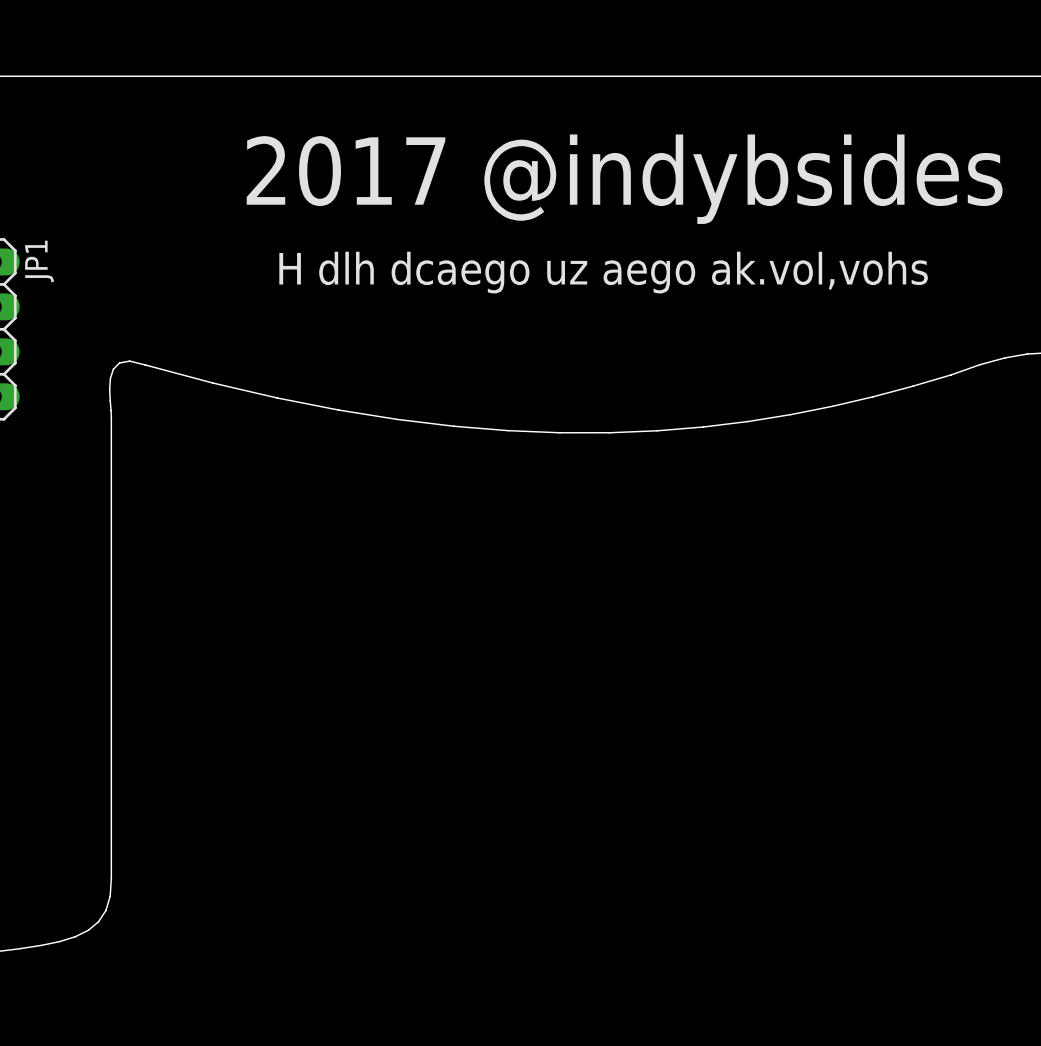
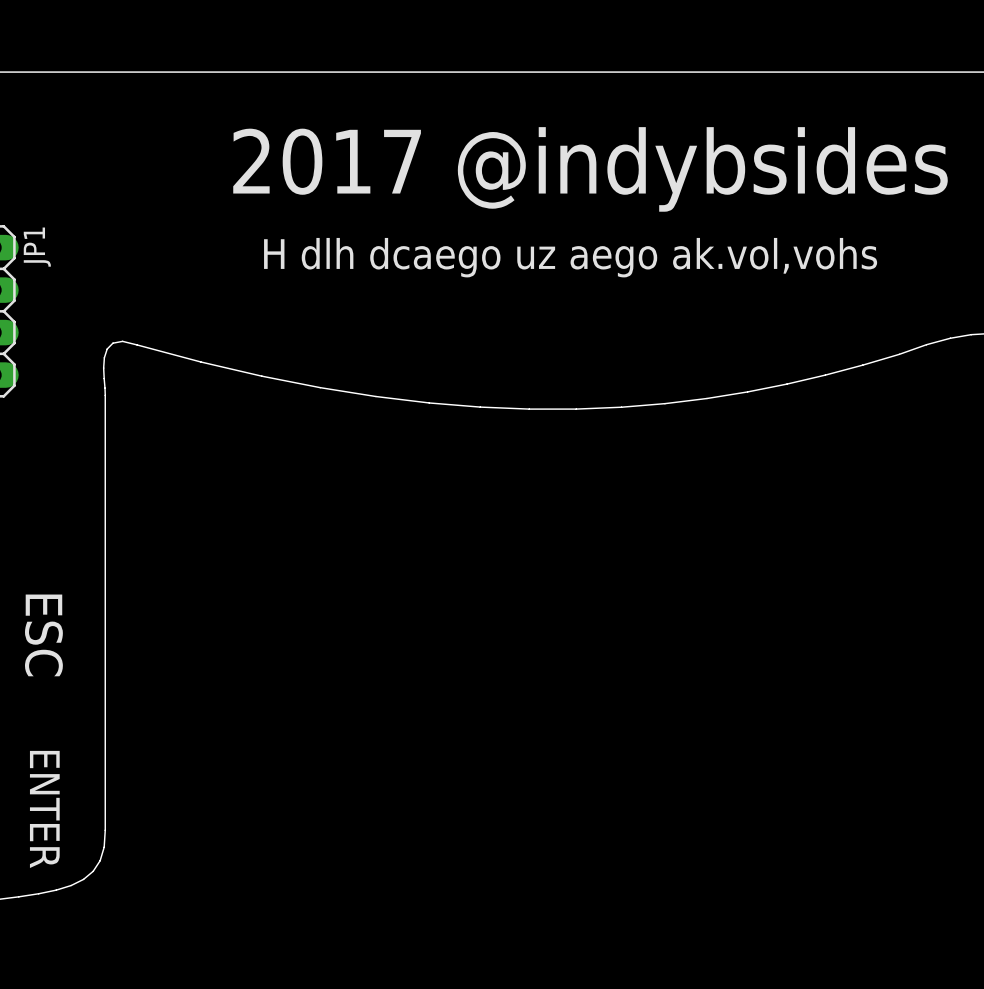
text: none -> ESC (43, 635)
text: none -> ENTER (44, 809)

